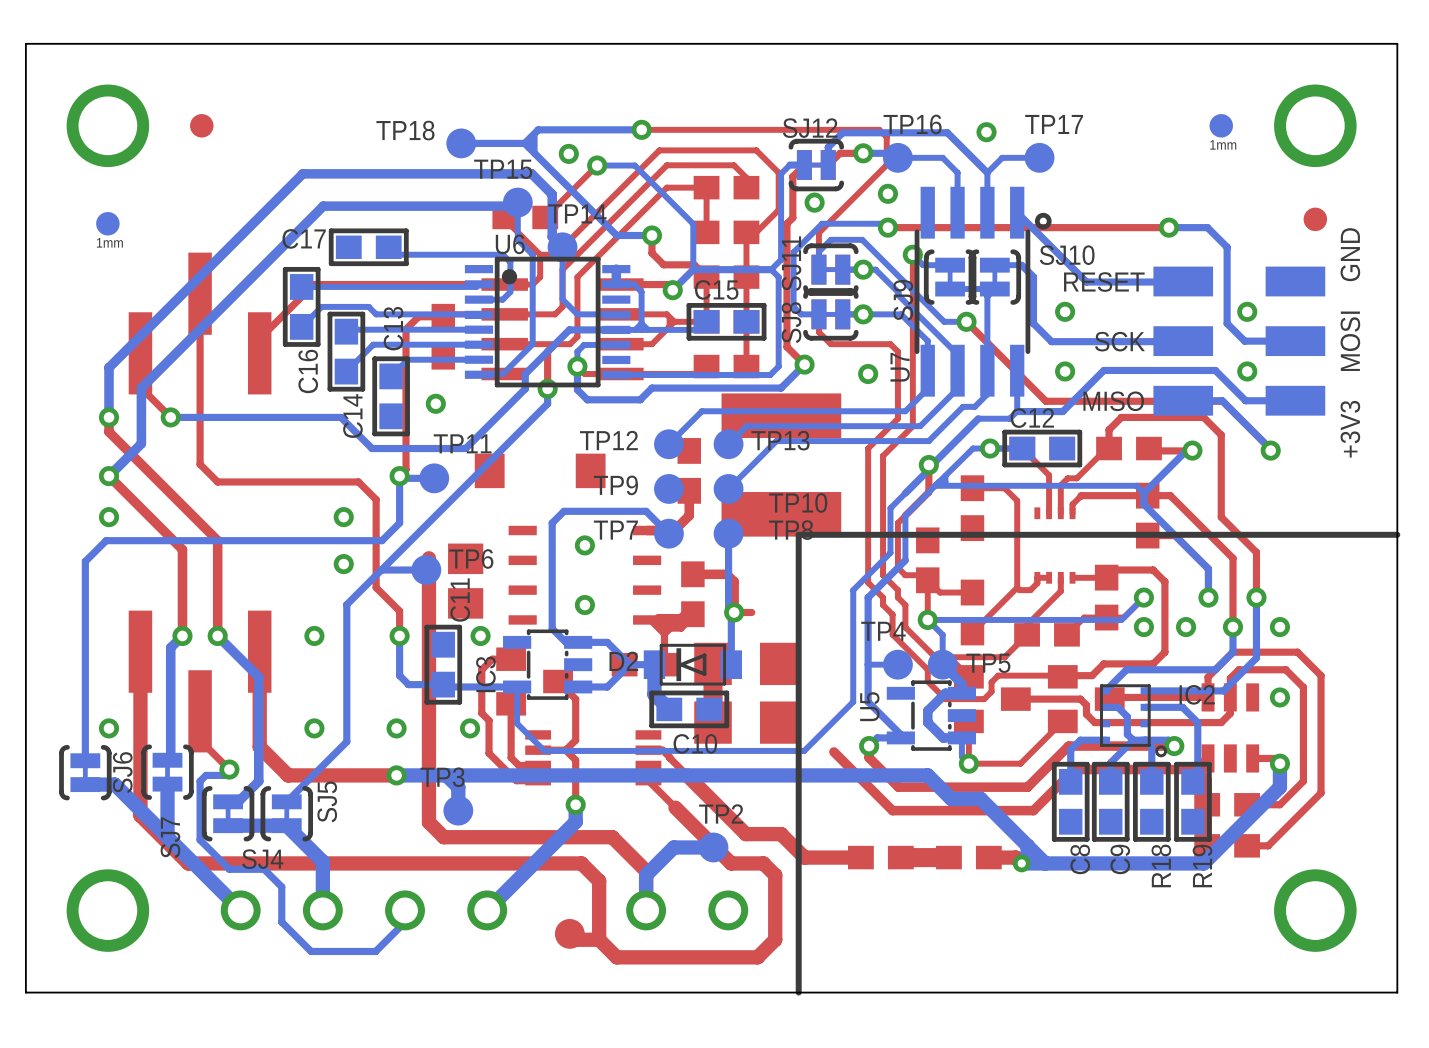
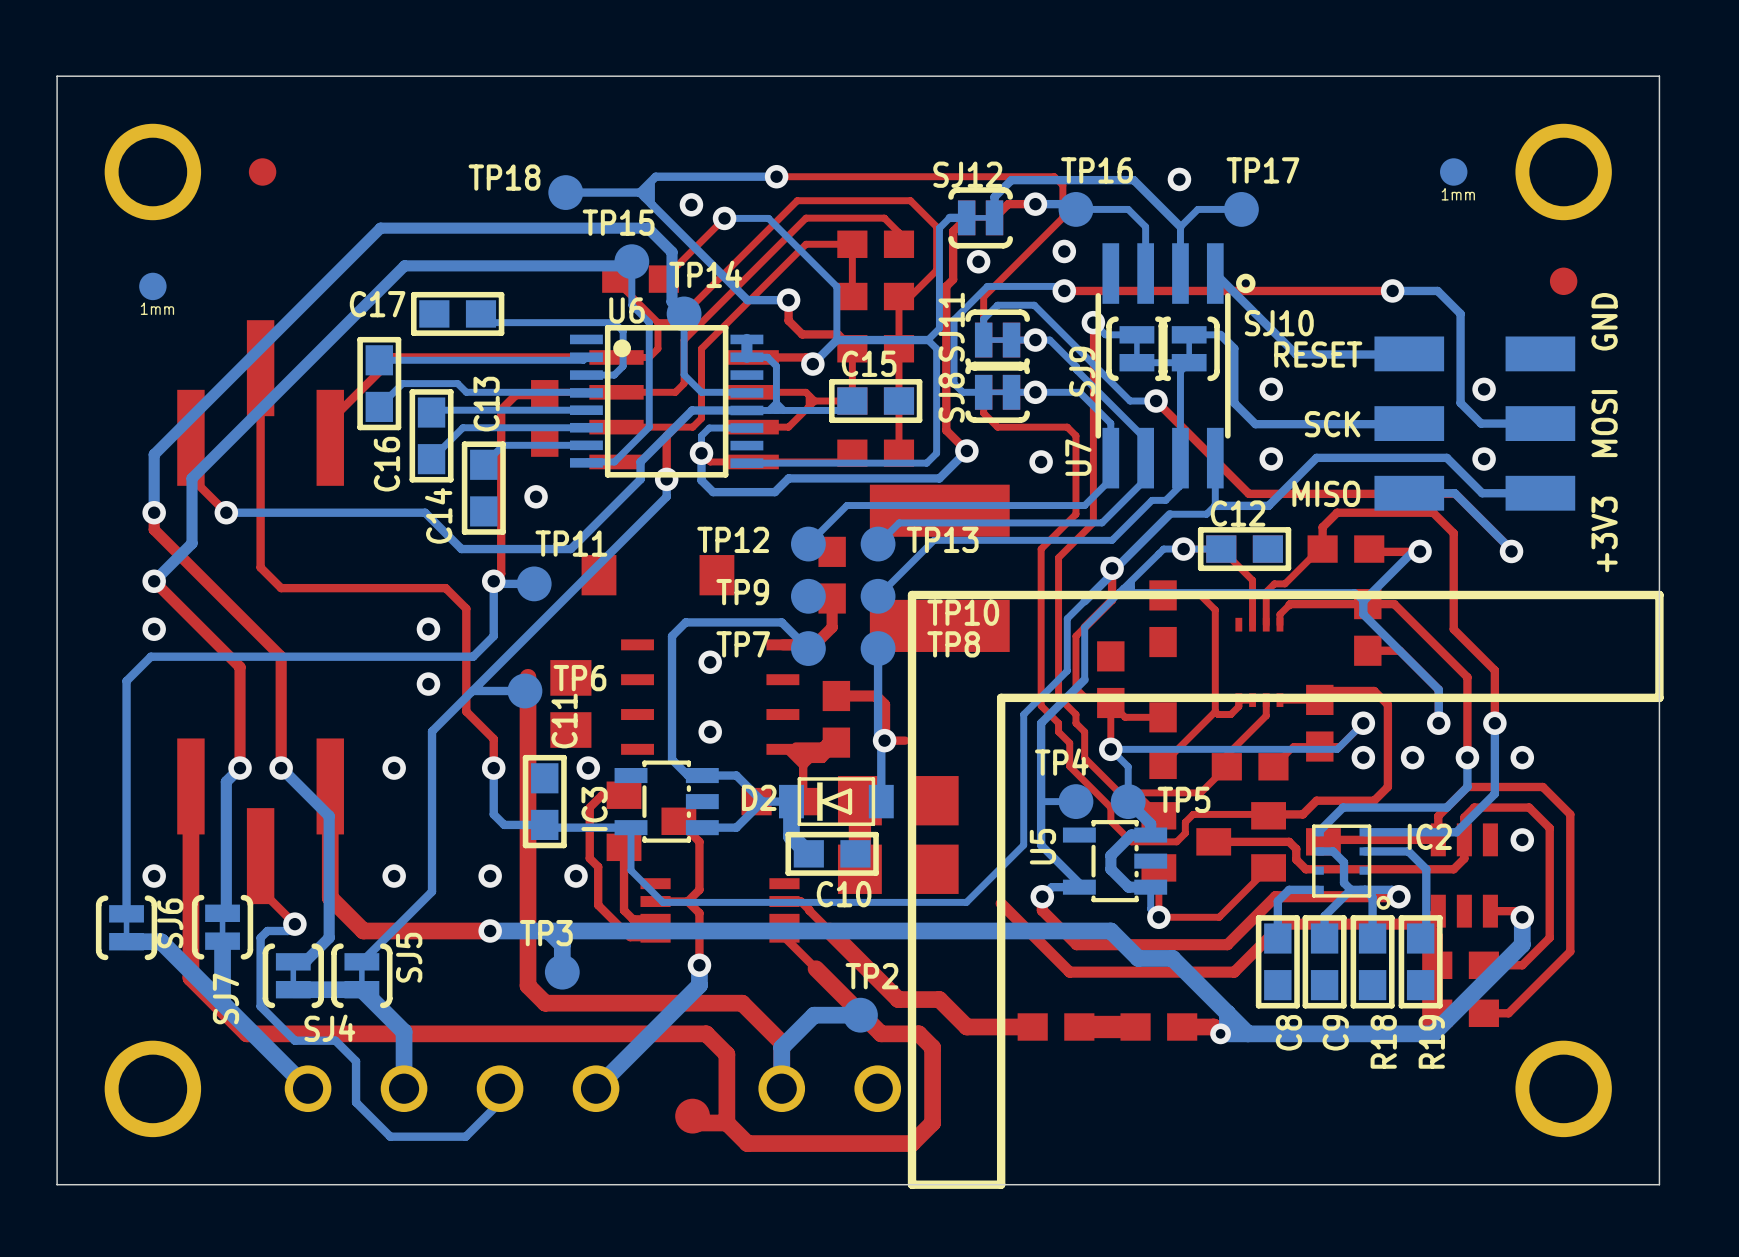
line: none -> (1659, 595) (912, 595) (912, 1184) (1001, 1184) (1001, 697) (1659, 697) (1659, 595)
line: (1397, 534) (798, 534) (798, 992) -> none

